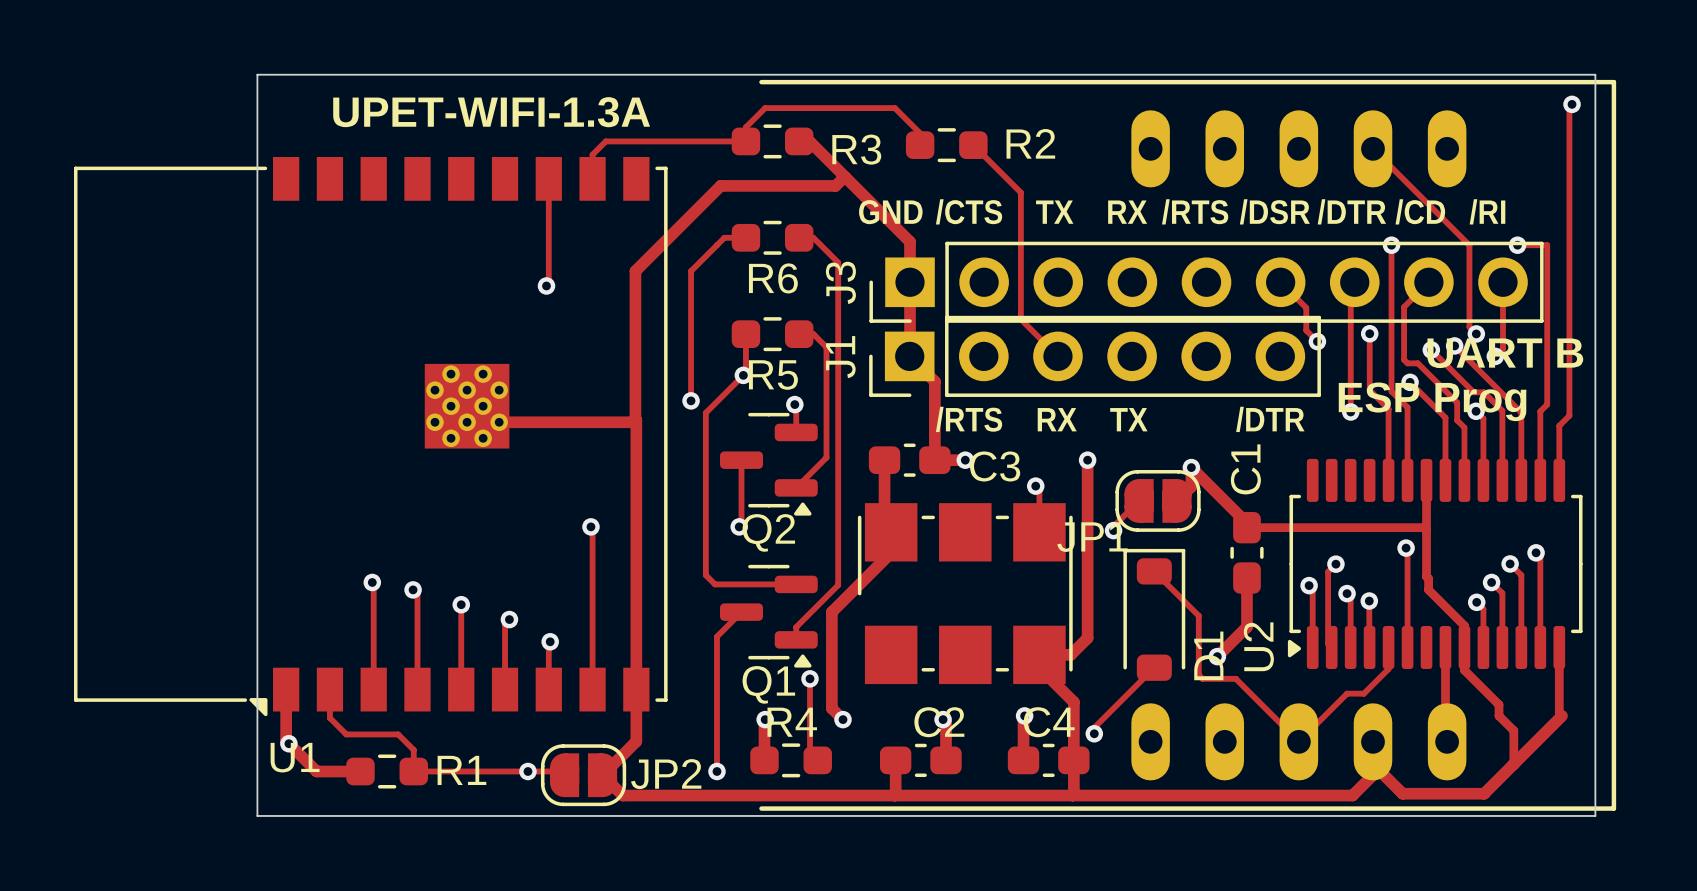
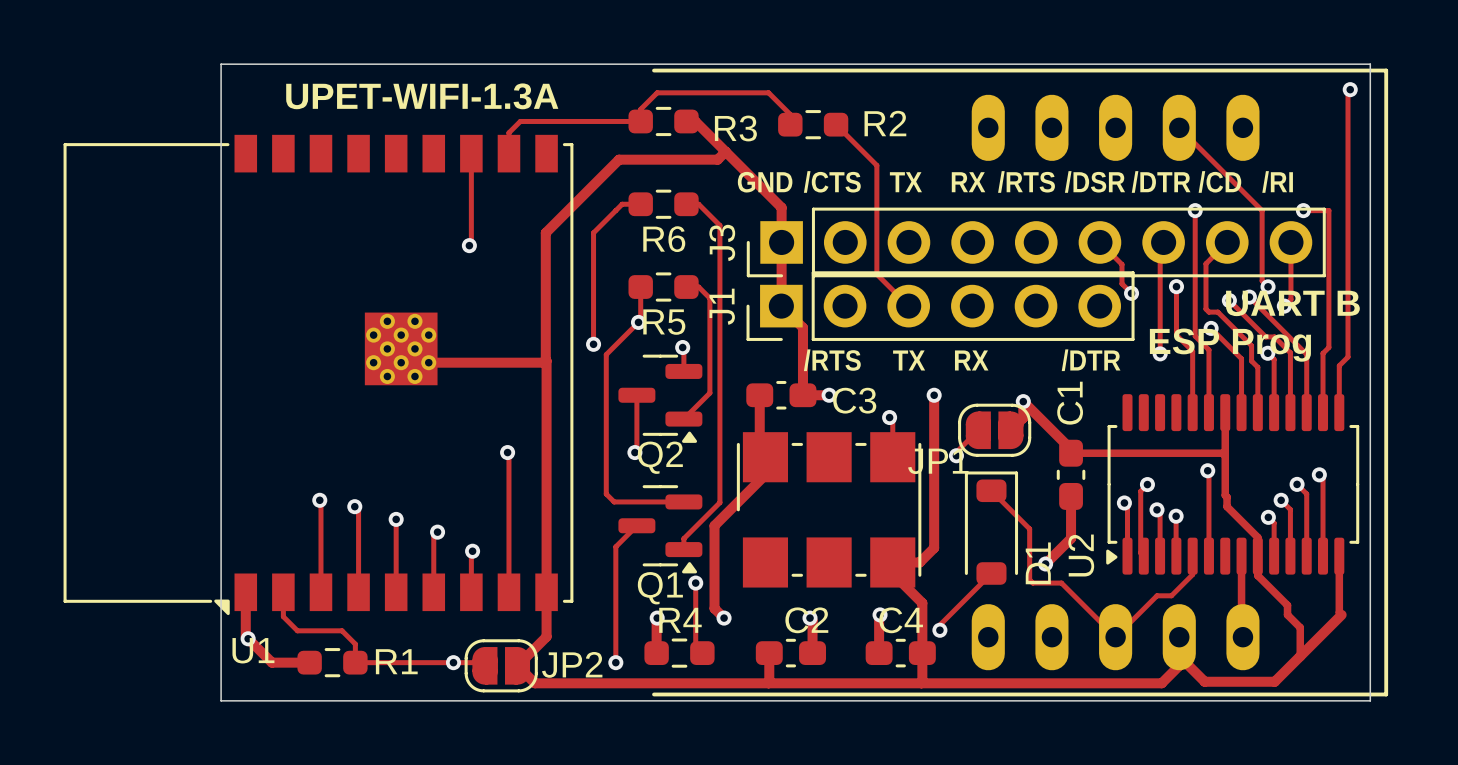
text: RX (1057, 419) -> TX (909, 360)
text: TX (1128, 419) -> RX (971, 360)

